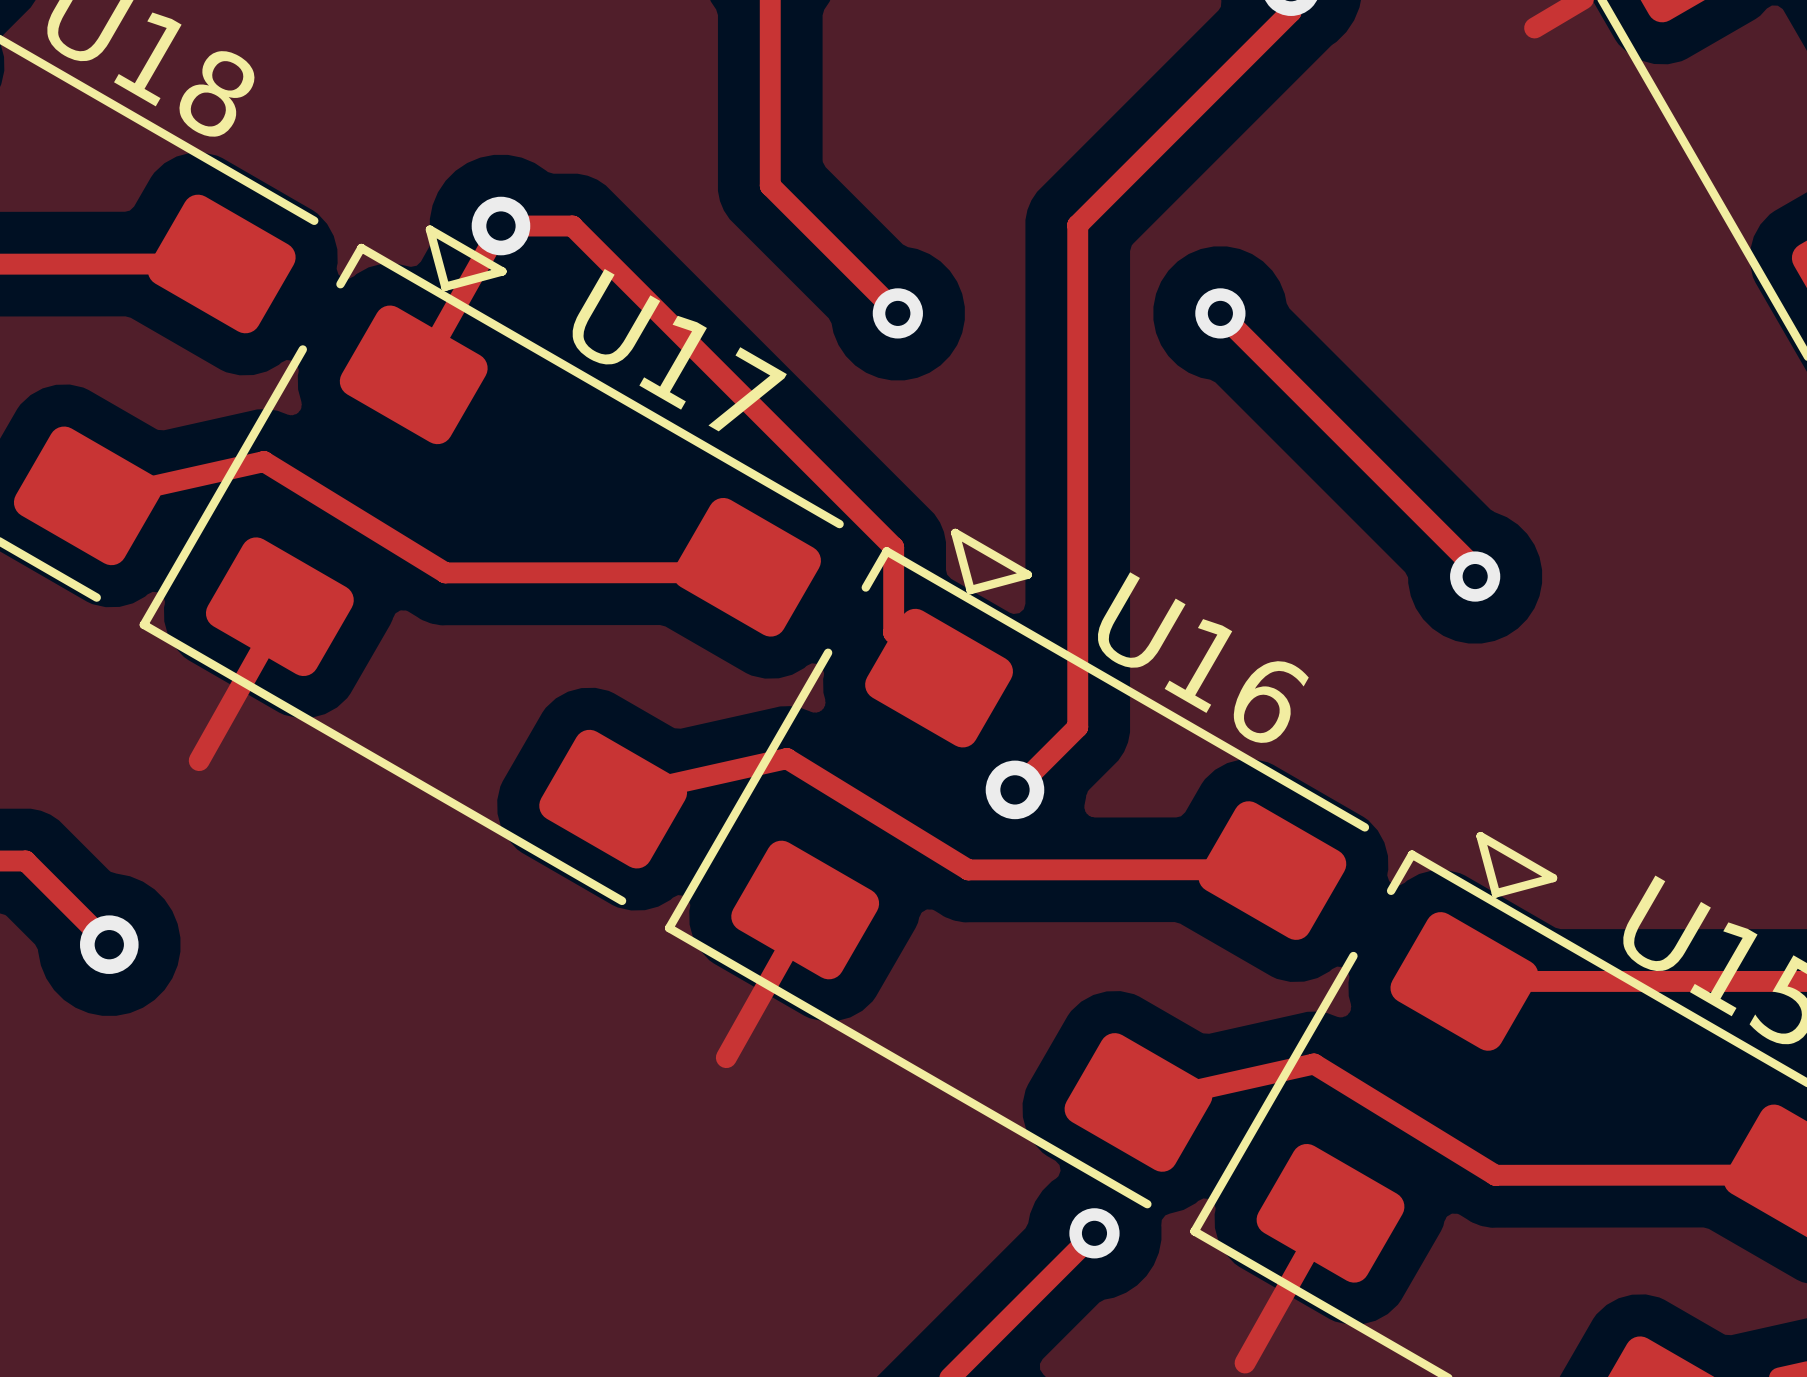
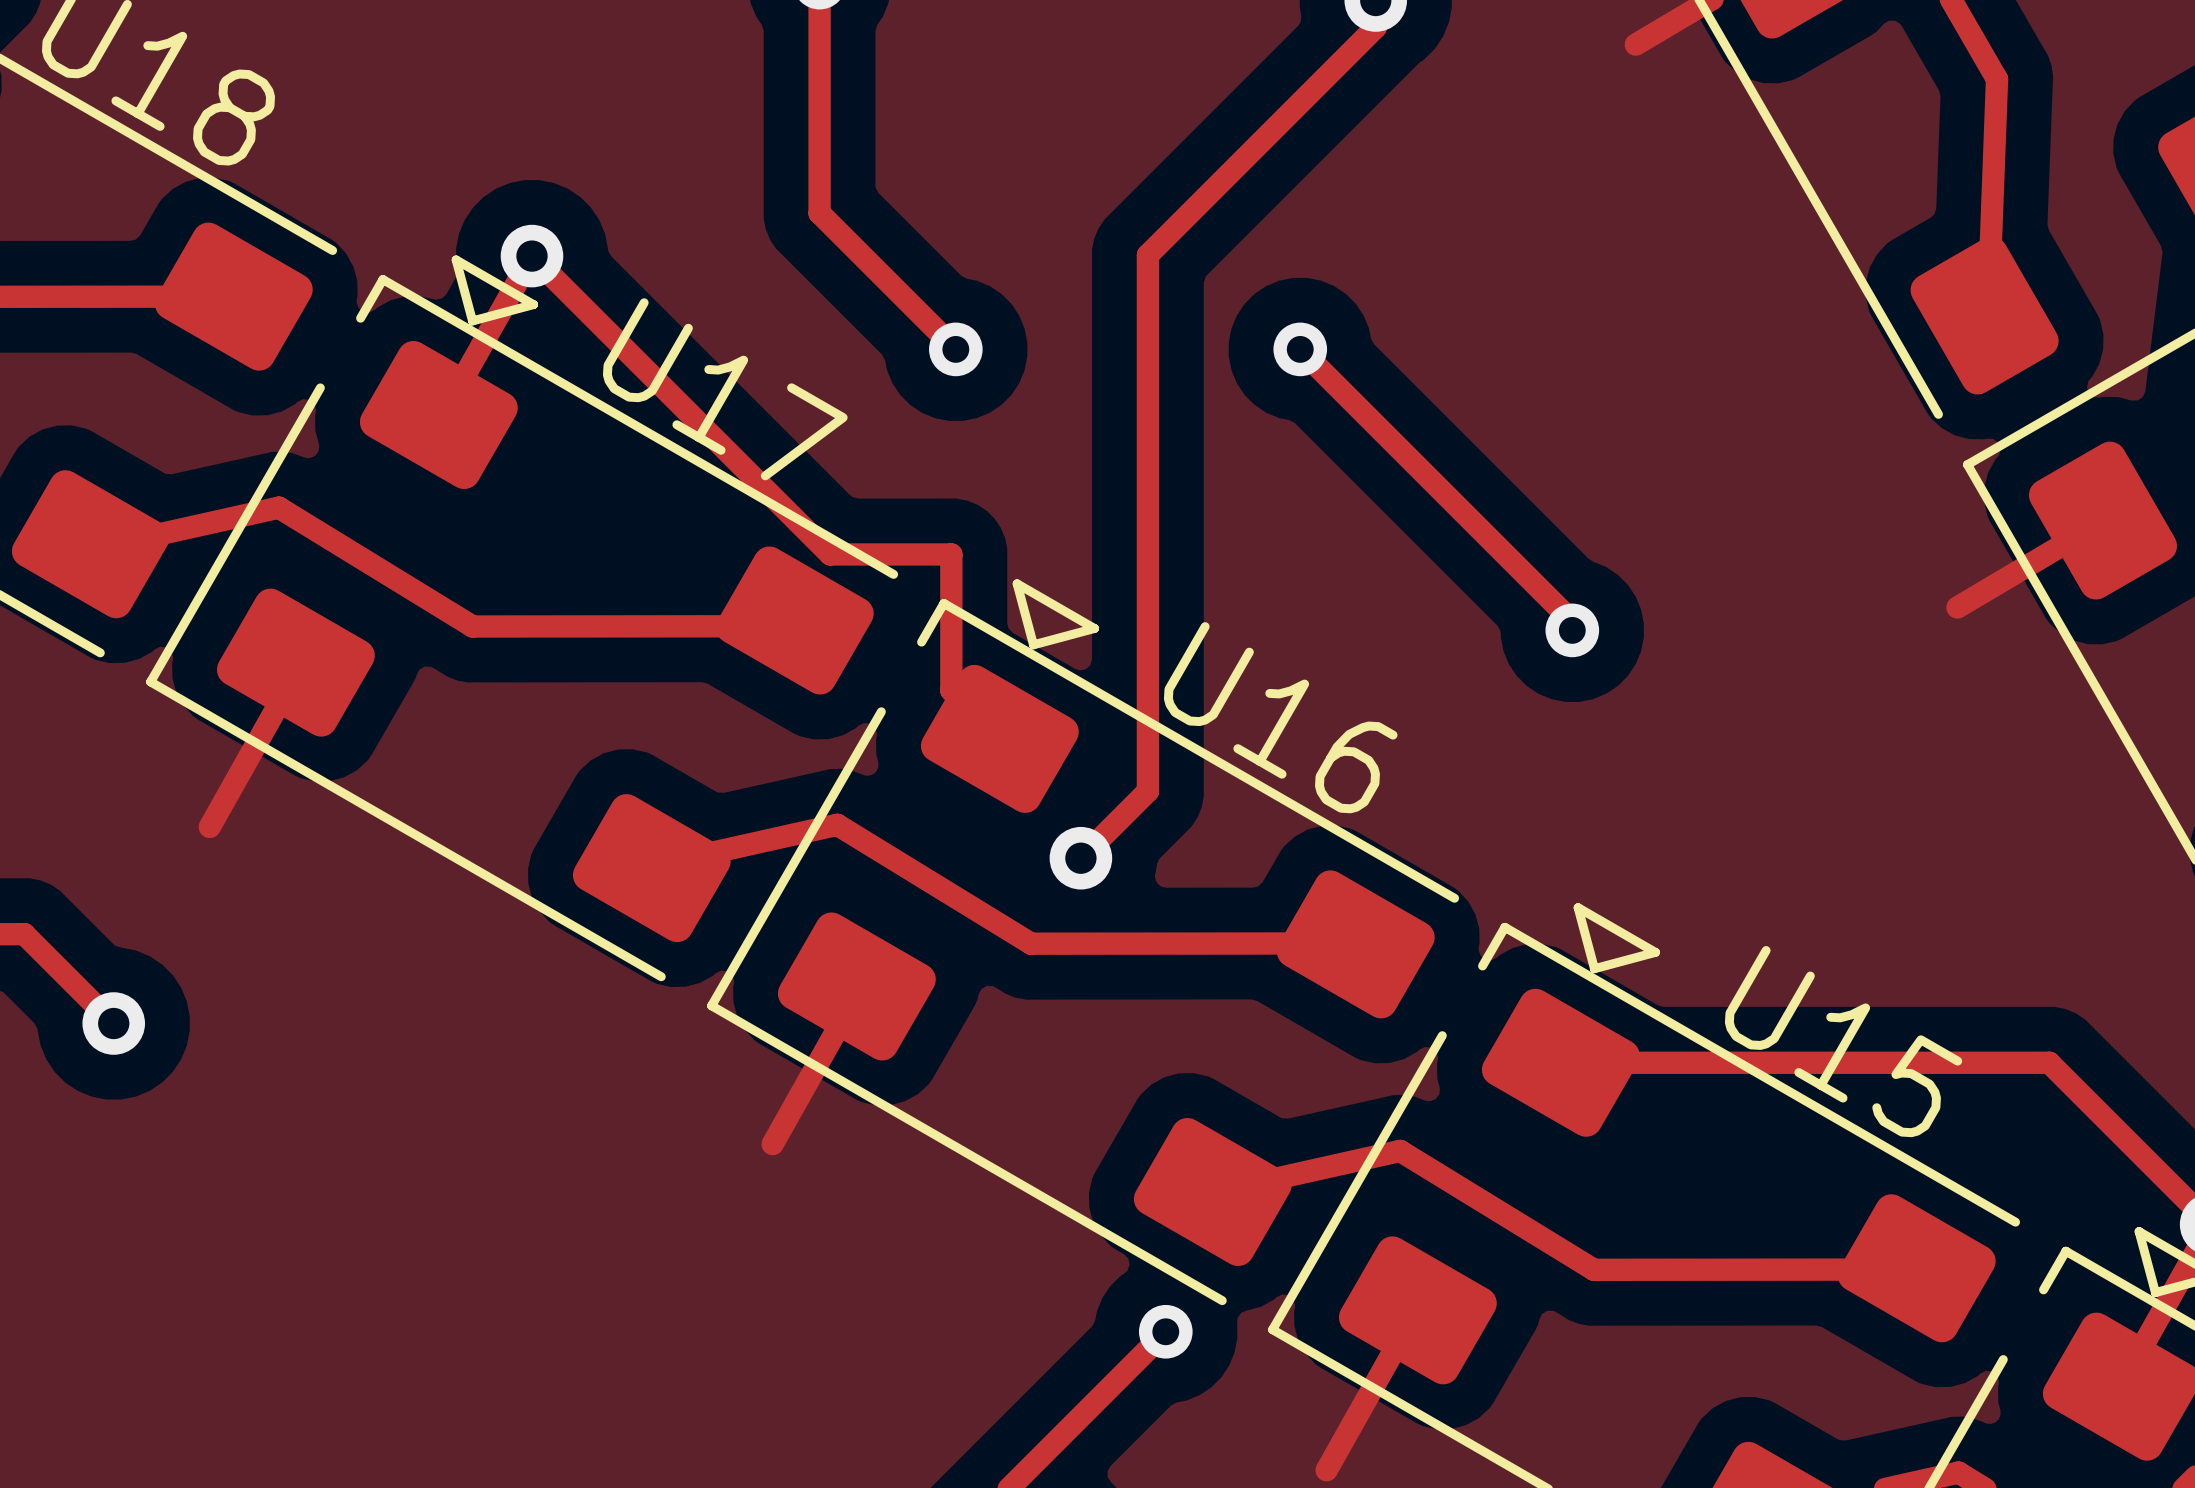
track: (500, 226) (572, 226) (893, 547) -> (531, 256) (830, 554) (951, 554) (951, 599)

